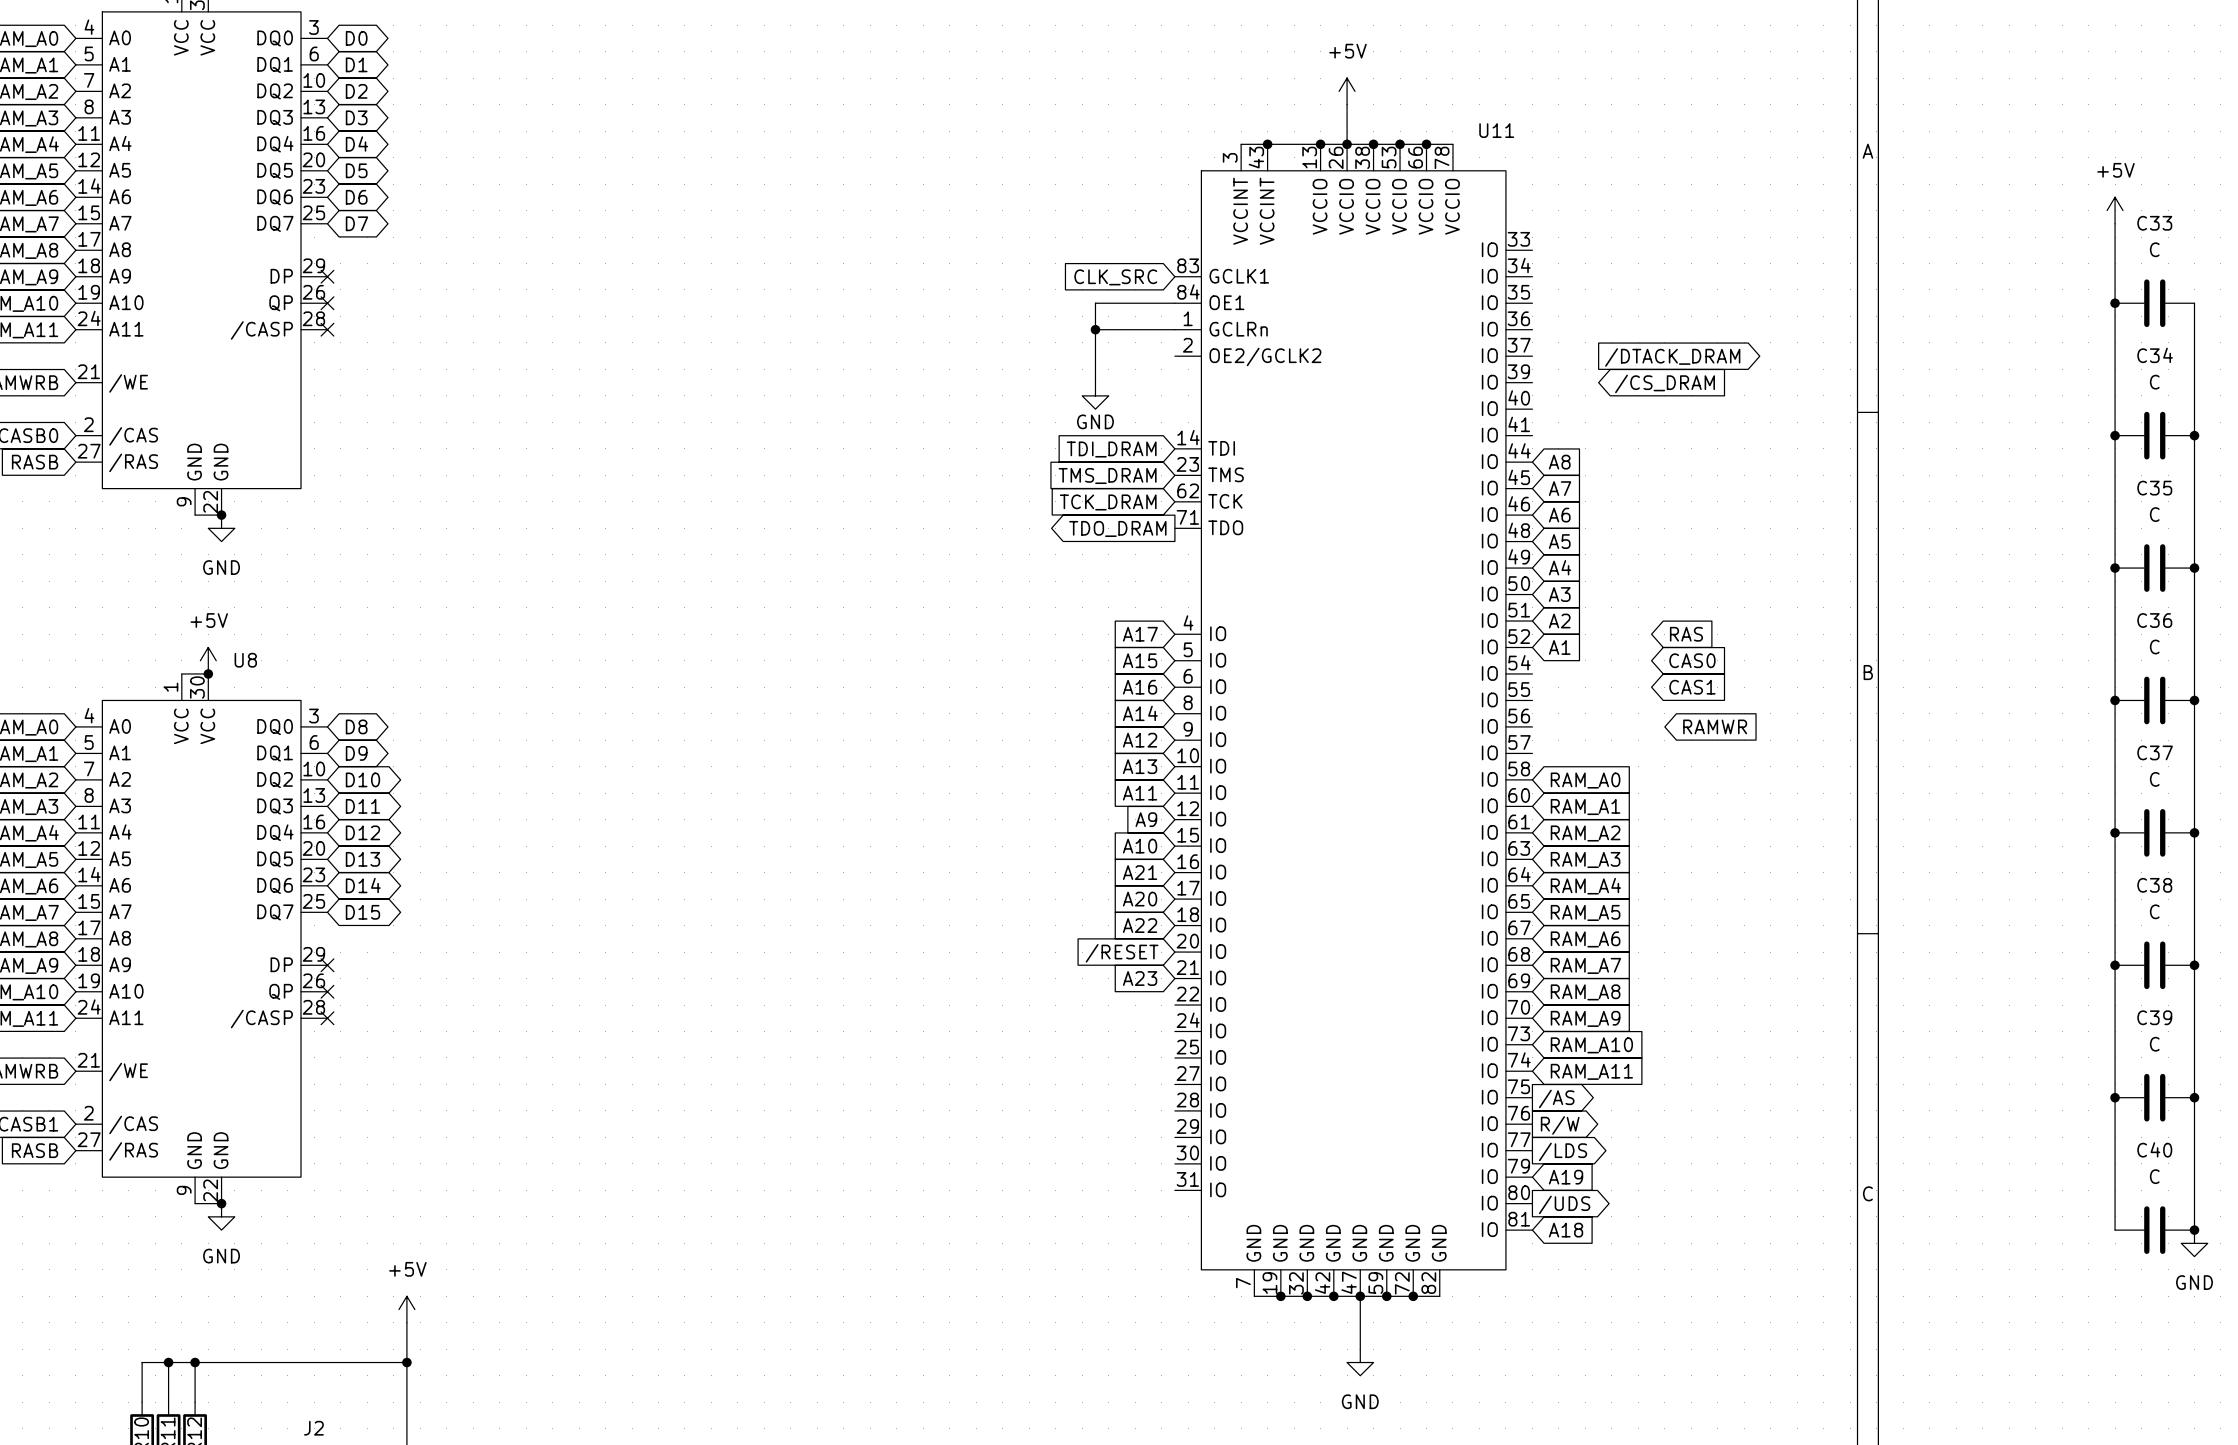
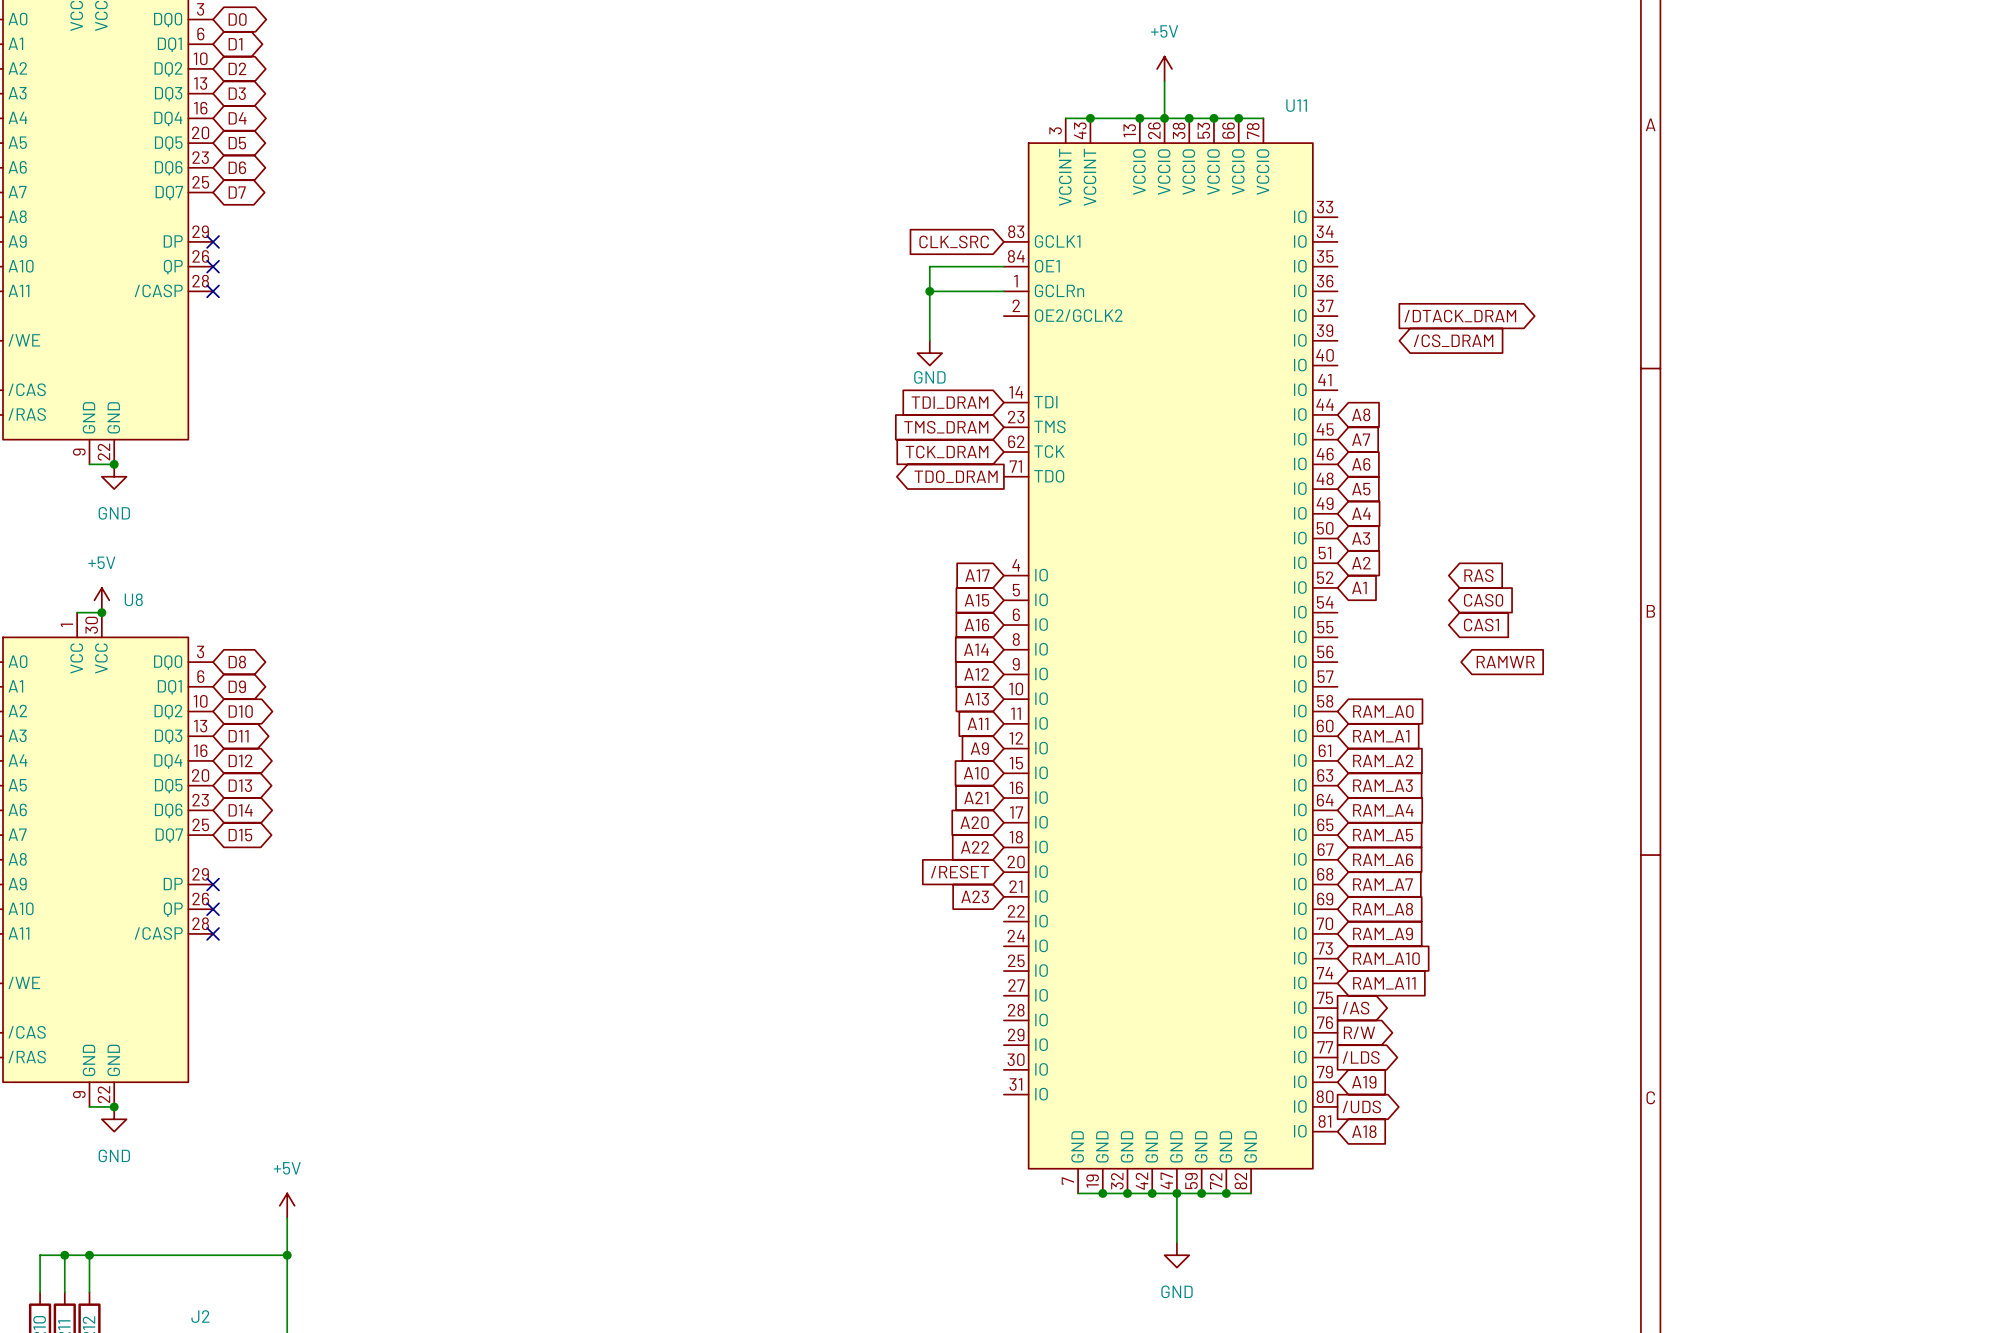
power symbol: +5V (2115, 210) -> none
wire: (2115, 223) (2115, 1230) -> none
junction: (2115, 303) -> none
C33: C (2154, 303) -> none
wire: (2194, 303) (2194, 1230) -> none
junction: (2115, 435) -> none
C34: C (2154, 435) -> none
junction: (2194, 435) -> none
junction: (2115, 568) -> none
C35: C (2154, 568) -> none
junction: (2194, 568) -> none
junction: (2115, 700) -> none
C36: C (2154, 700) -> none
junction: (2194, 700) -> none
junction: (2115, 832) -> none
C37: C (2154, 832) -> none
junction: (2194, 832) -> none
junction: (2115, 965) -> none
C38: C (2154, 965) -> none
junction: (2194, 965) -> none
junction: (2115, 1097) -> none
C39: C (2154, 1097) -> none
junction: (2194, 1097) -> none
C40: C (2154, 1230) -> none
junction: (2194, 1230) -> none
power symbol: GND (2194, 1243) -> none

